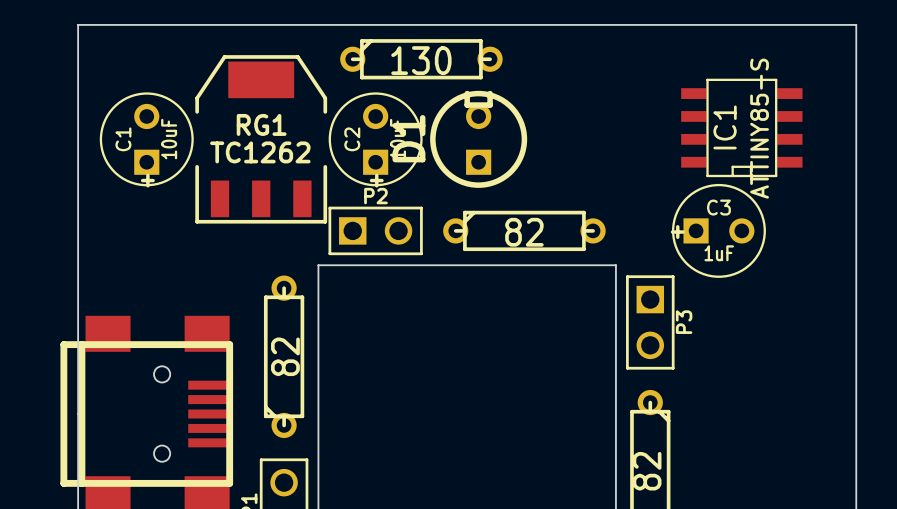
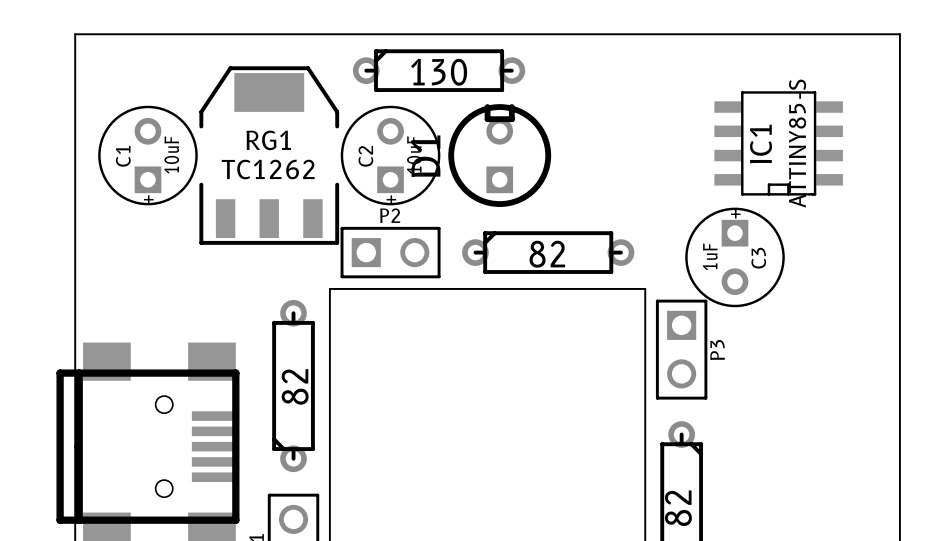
C3 rotation: 0° (718, 230) -> 90° clockwise (735, 257)

